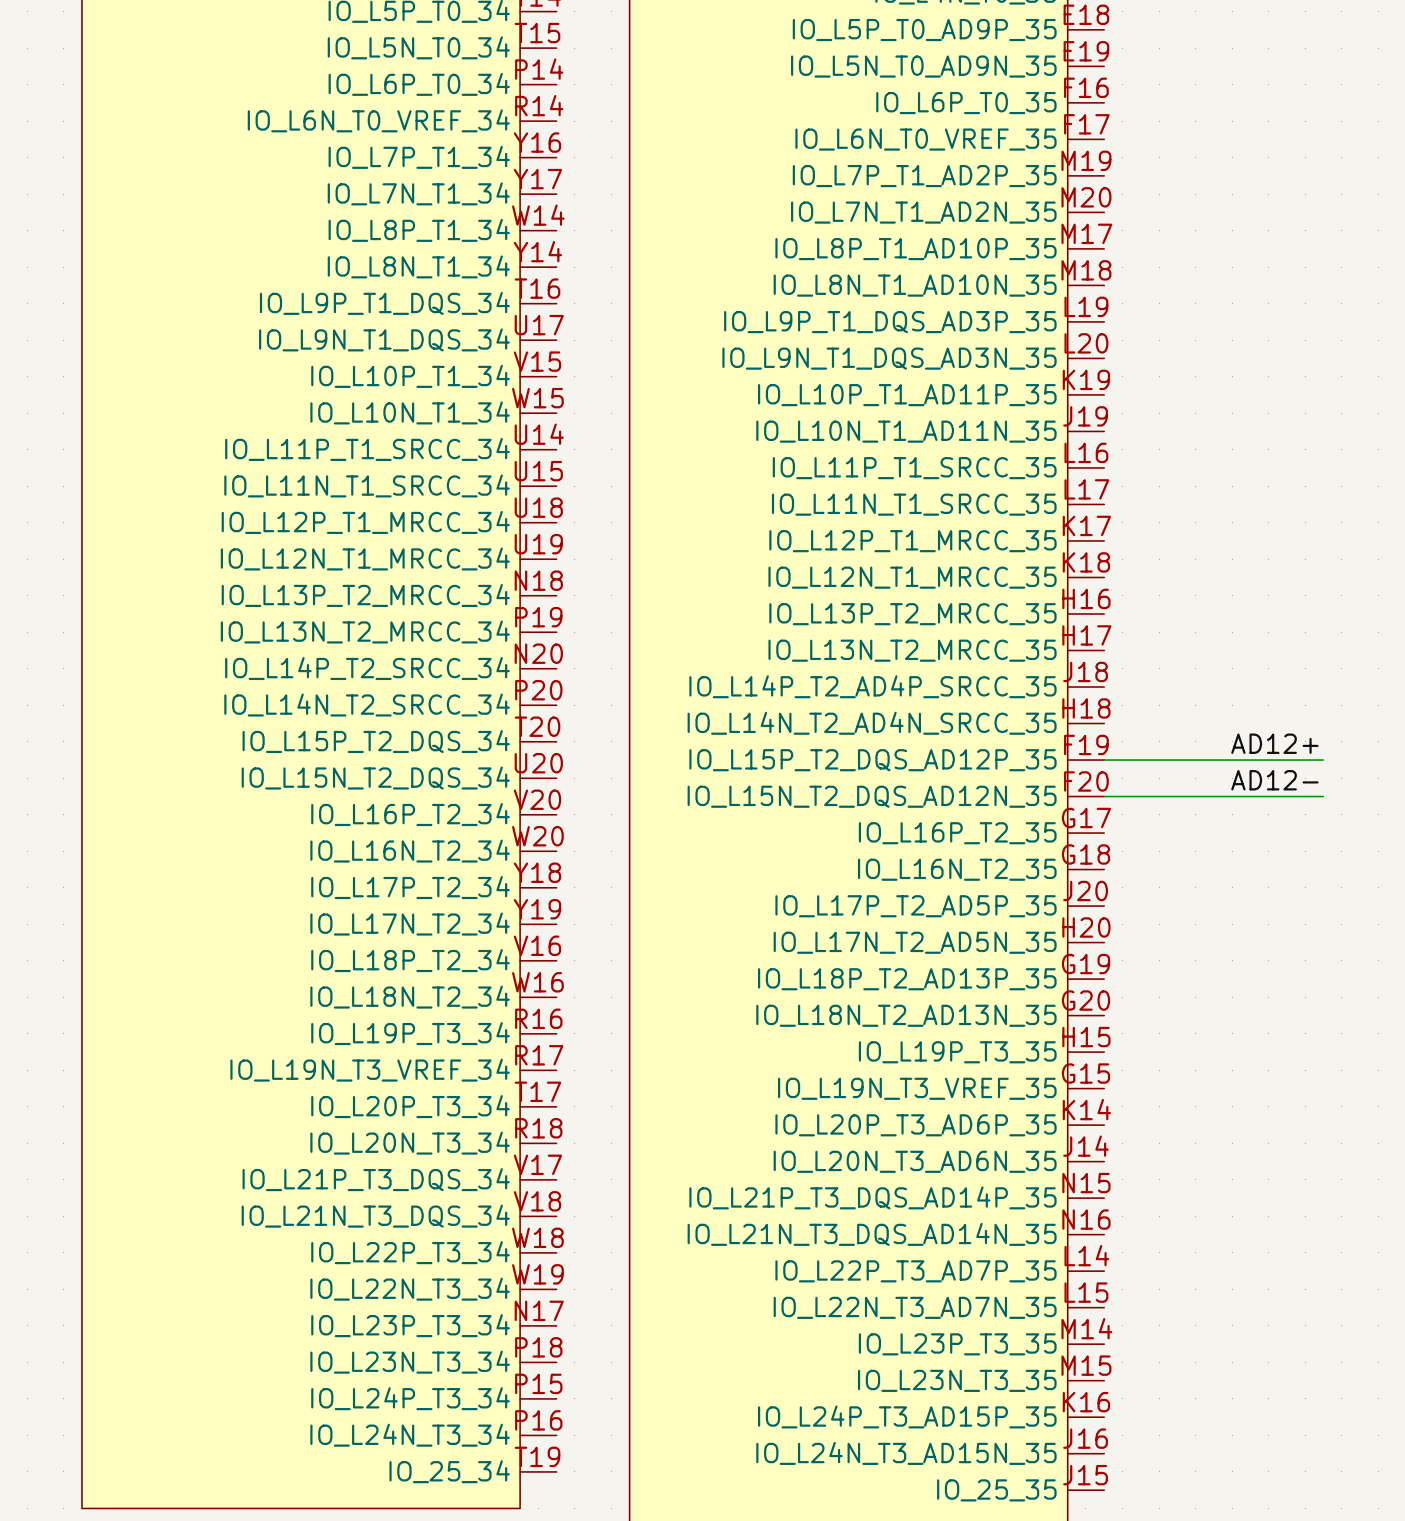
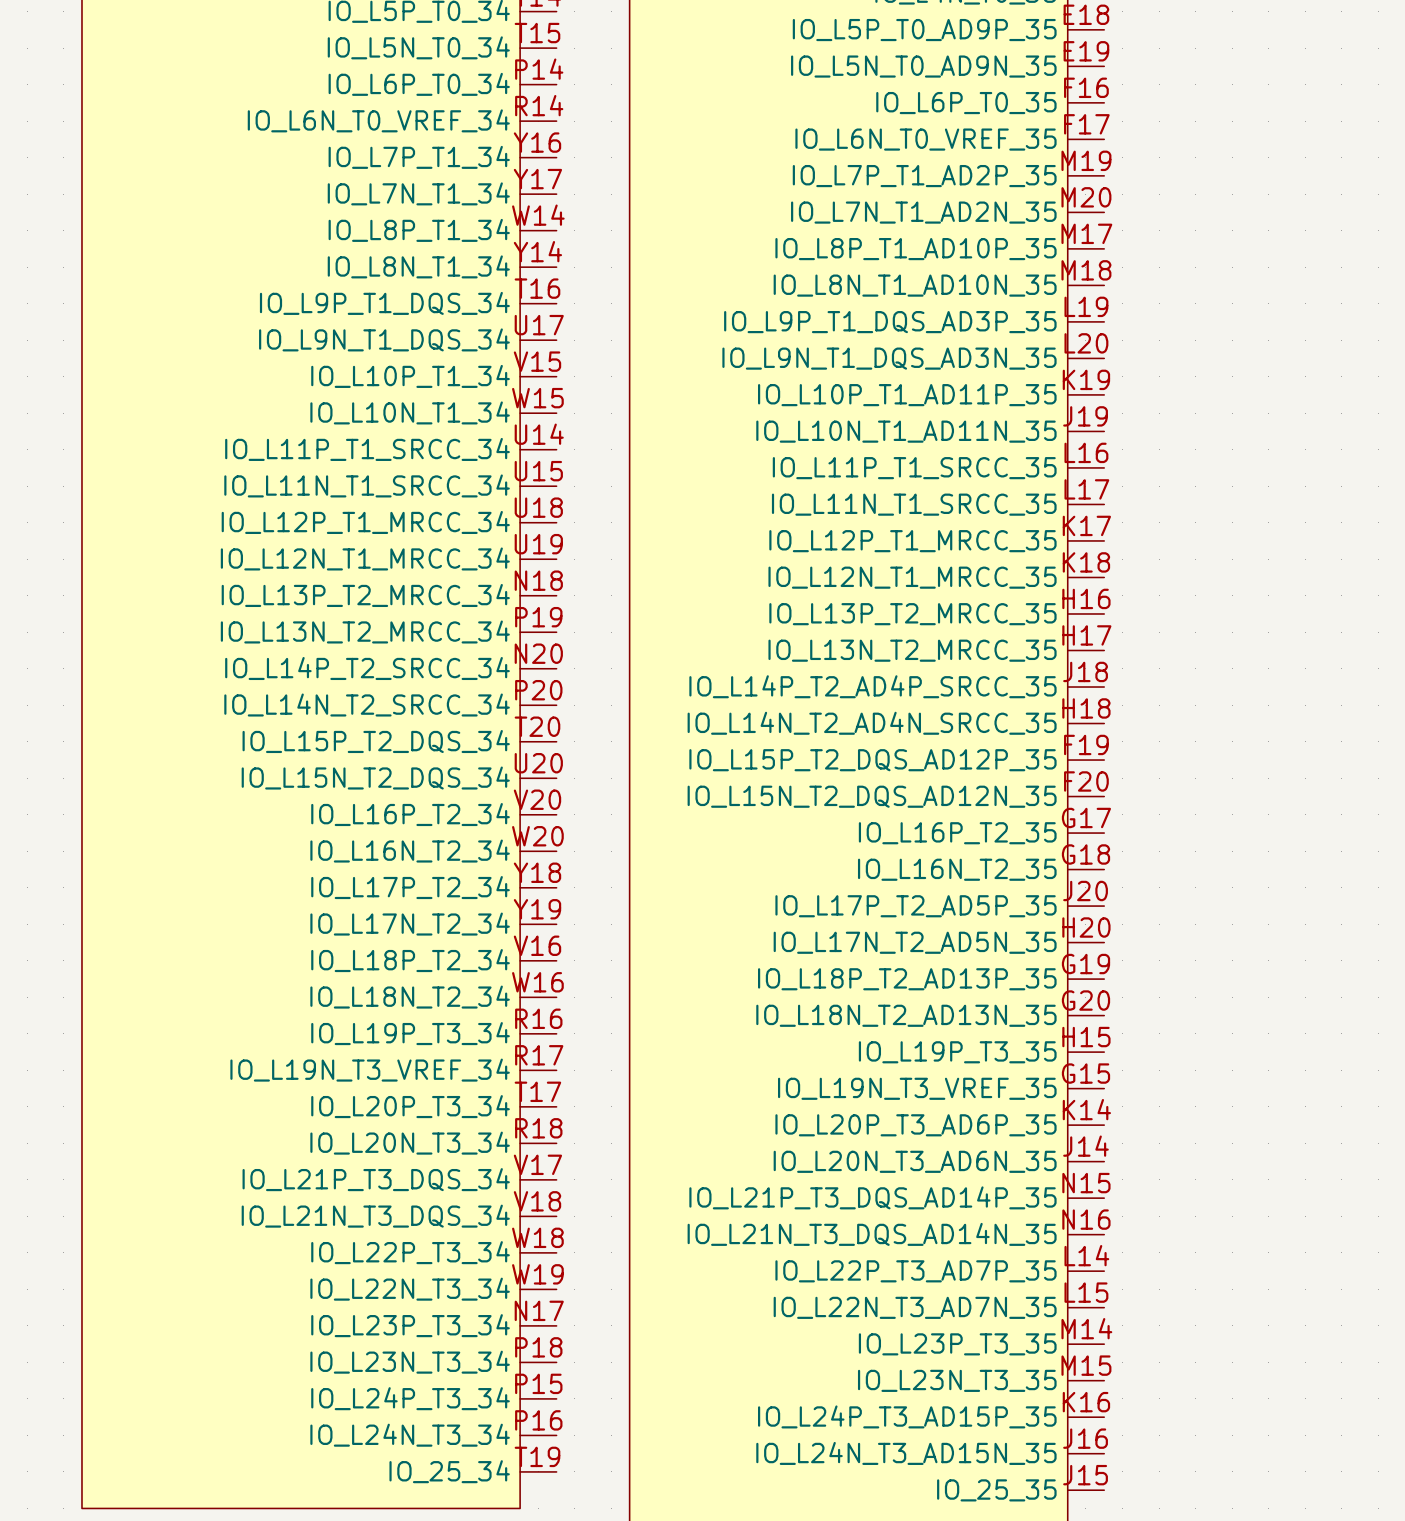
label: AD12+ (1274, 743) -> none
wire: (1104, 760) (1323, 760) -> none
label: AD12- (1274, 780) -> none
wire: (1104, 796) (1323, 796) -> none

